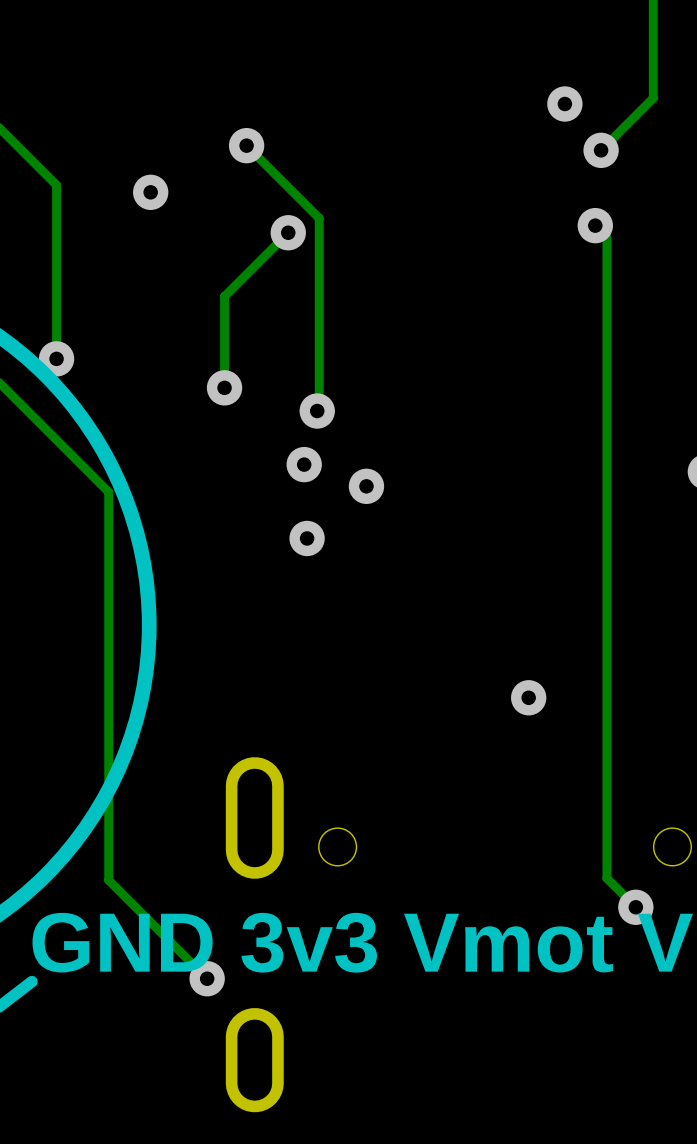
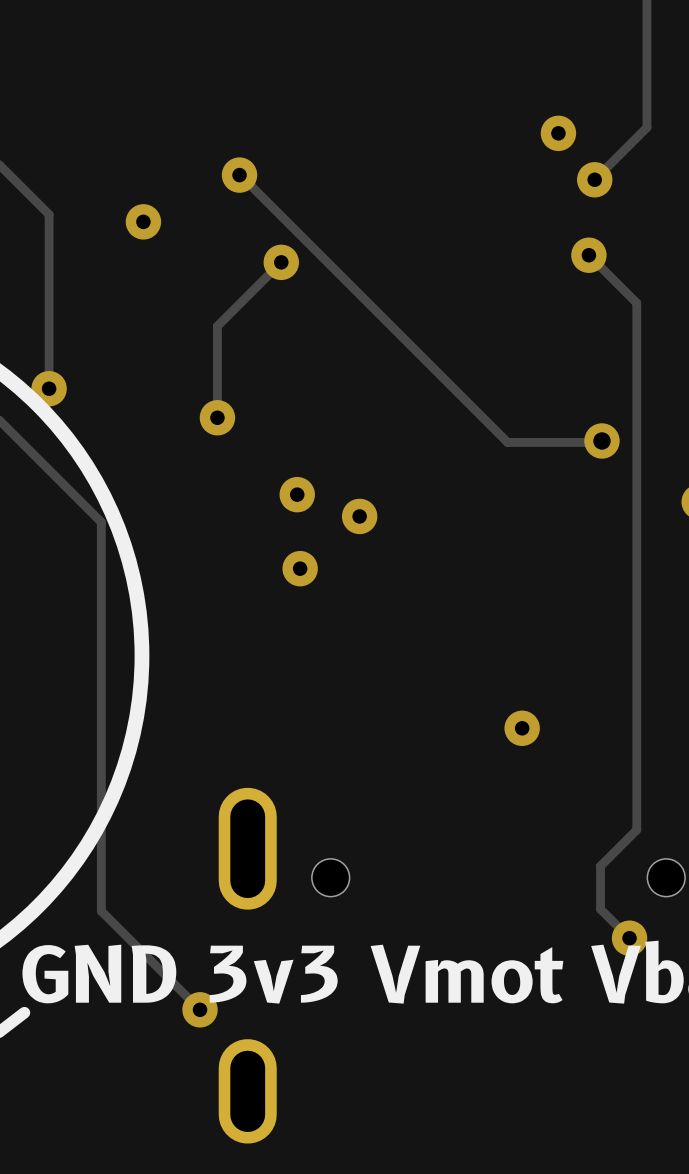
track: none -> (234, 169) (507, 442) (601, 440)
track: (246, 145) (319, 218) (319, 397) (317, 399) (317, 411) -> none
track: (606, 237) (606, 835) -> (600, 266) (636, 303) (636, 829) (600, 866)
via: (317, 411) -> none
via: none -> (601, 440)

